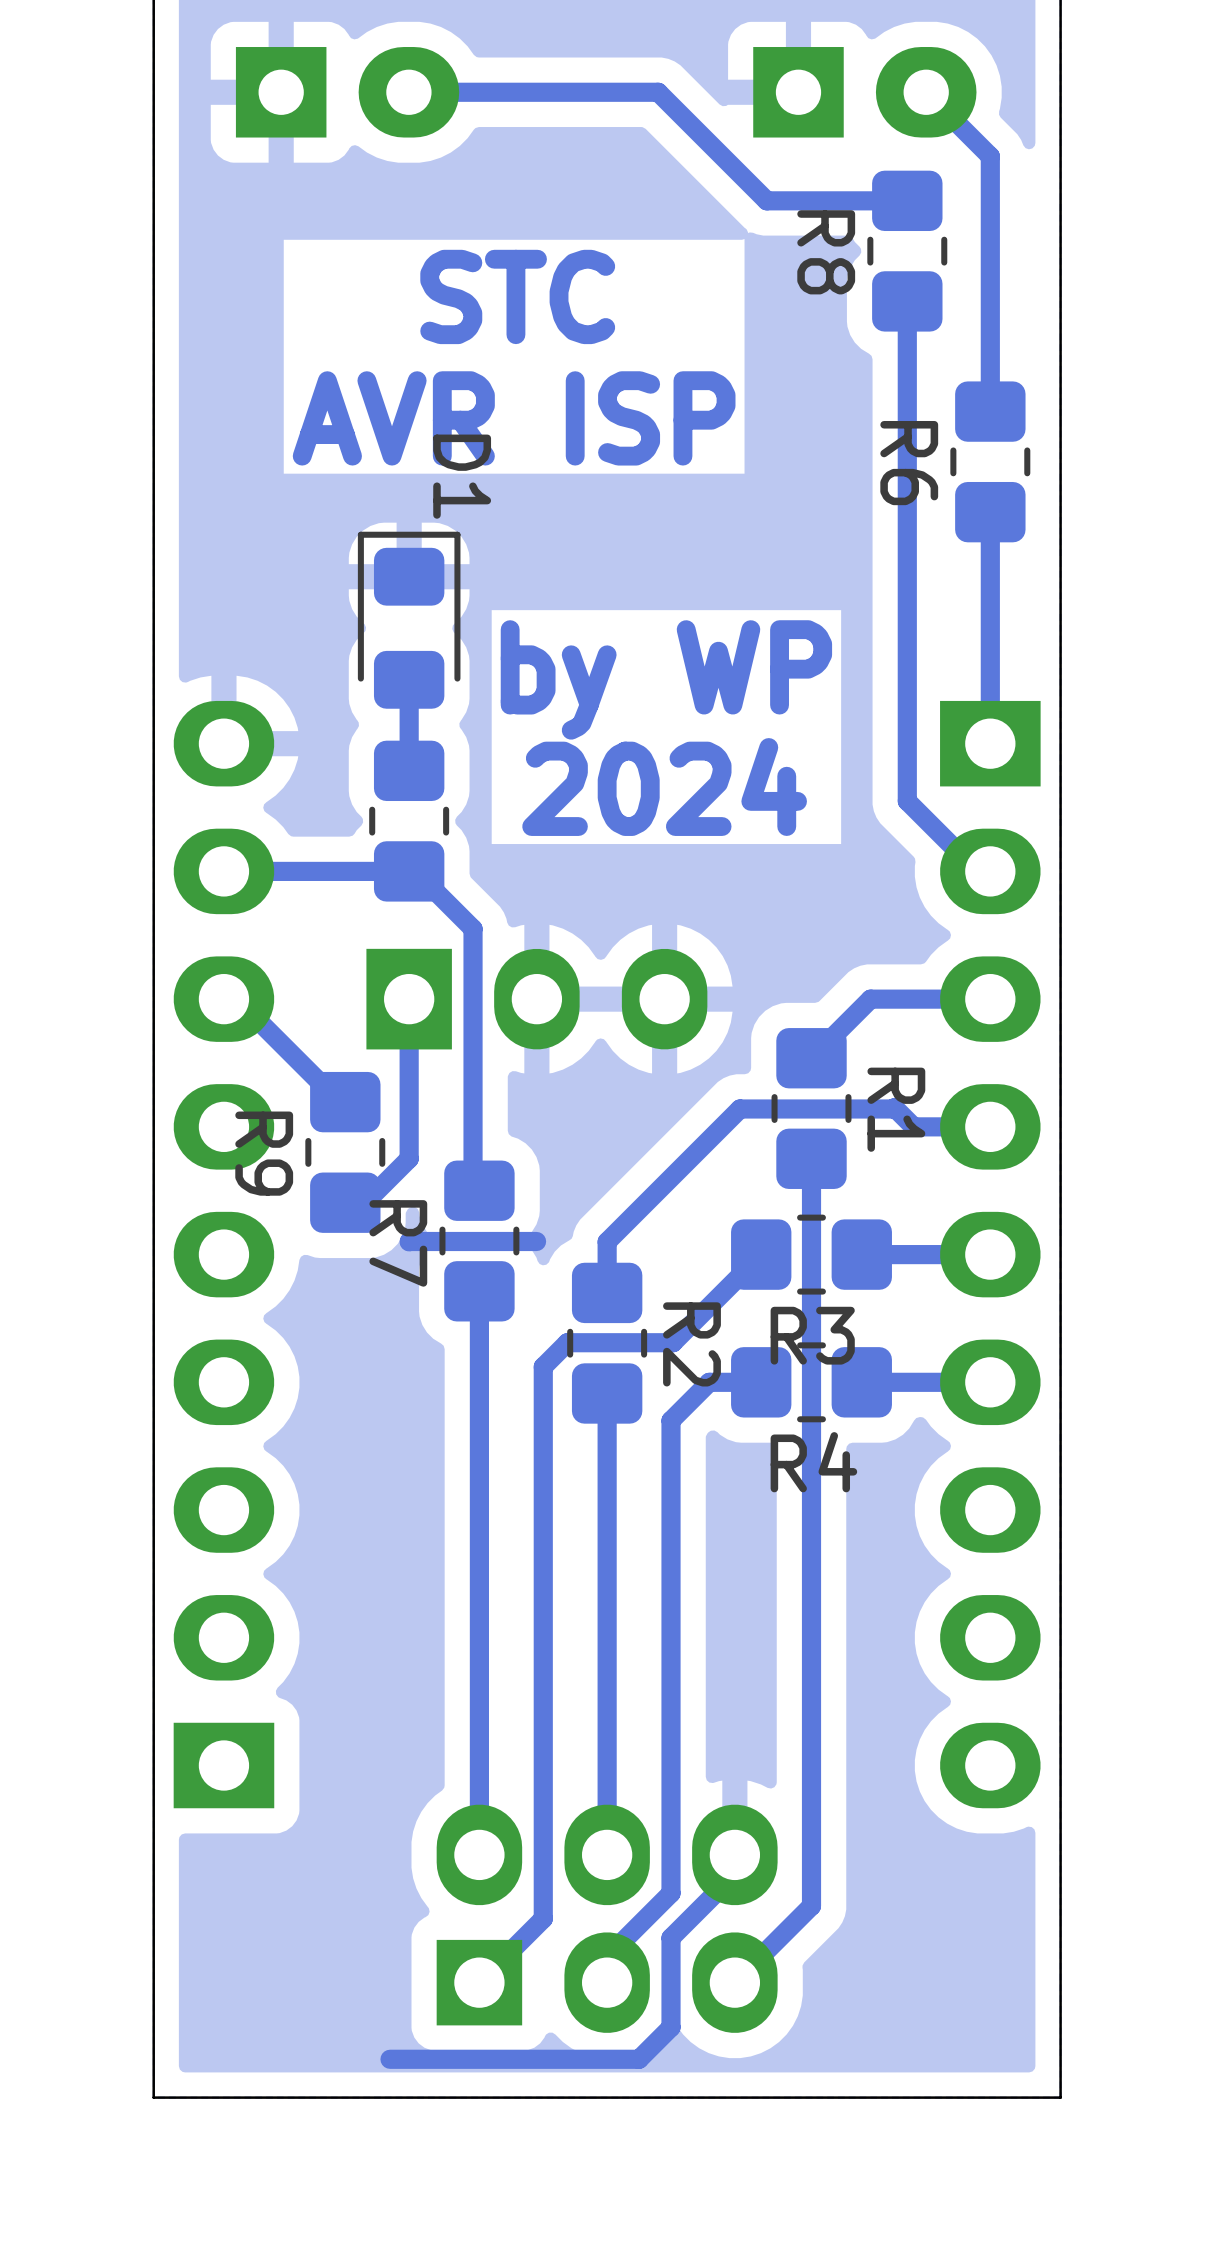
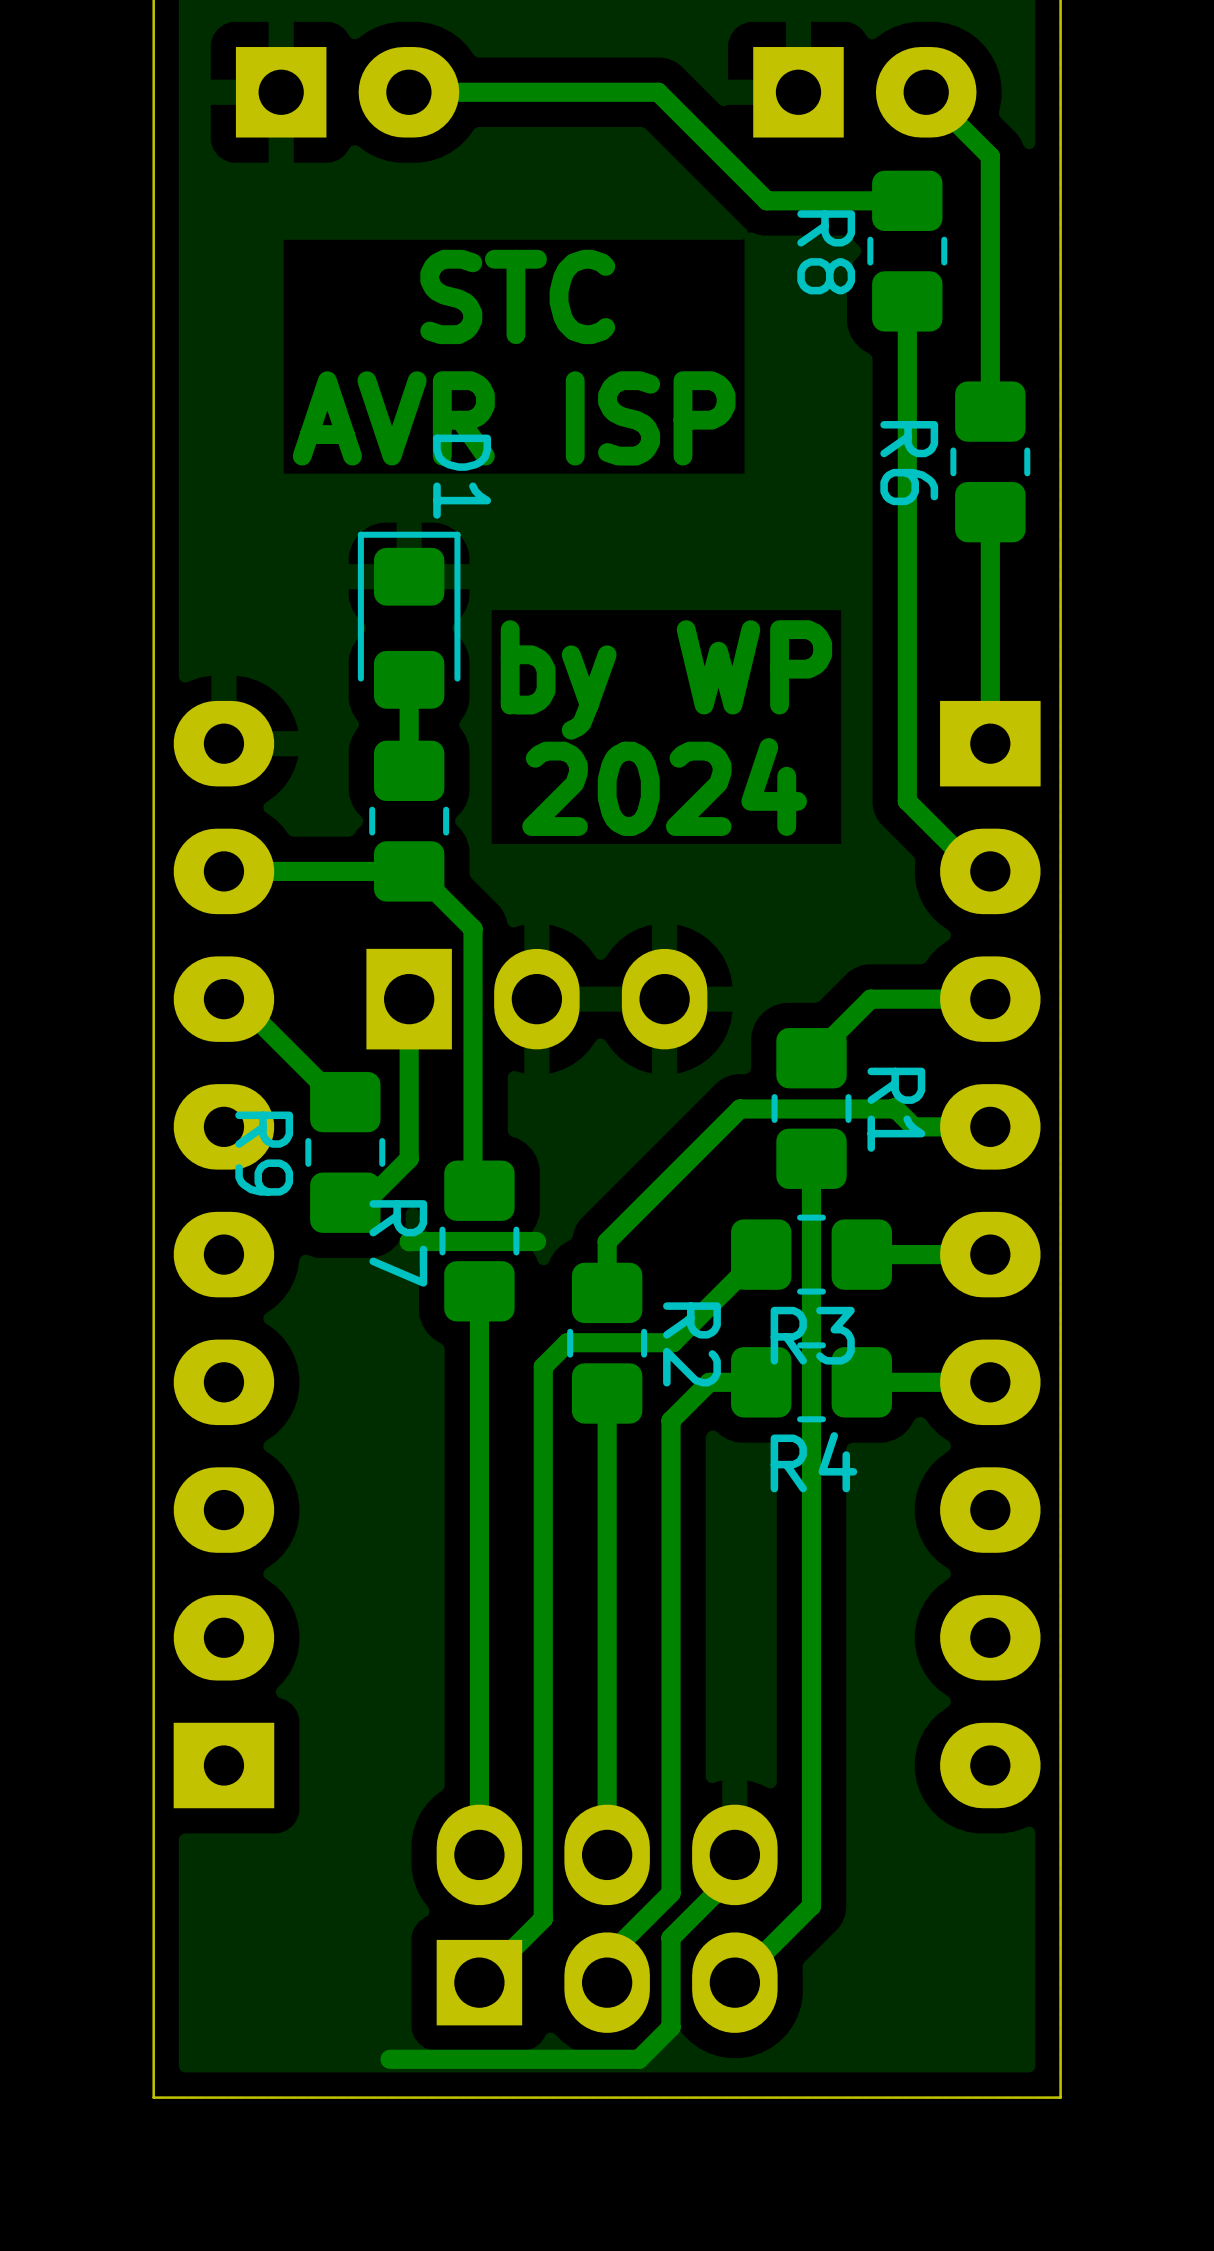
part footprint: [173, 700, 275, 1809] -> [173, 700, 275, 1809]
part footprint: [940, 700, 1041, 1809] -> [940, 700, 1041, 1809]

